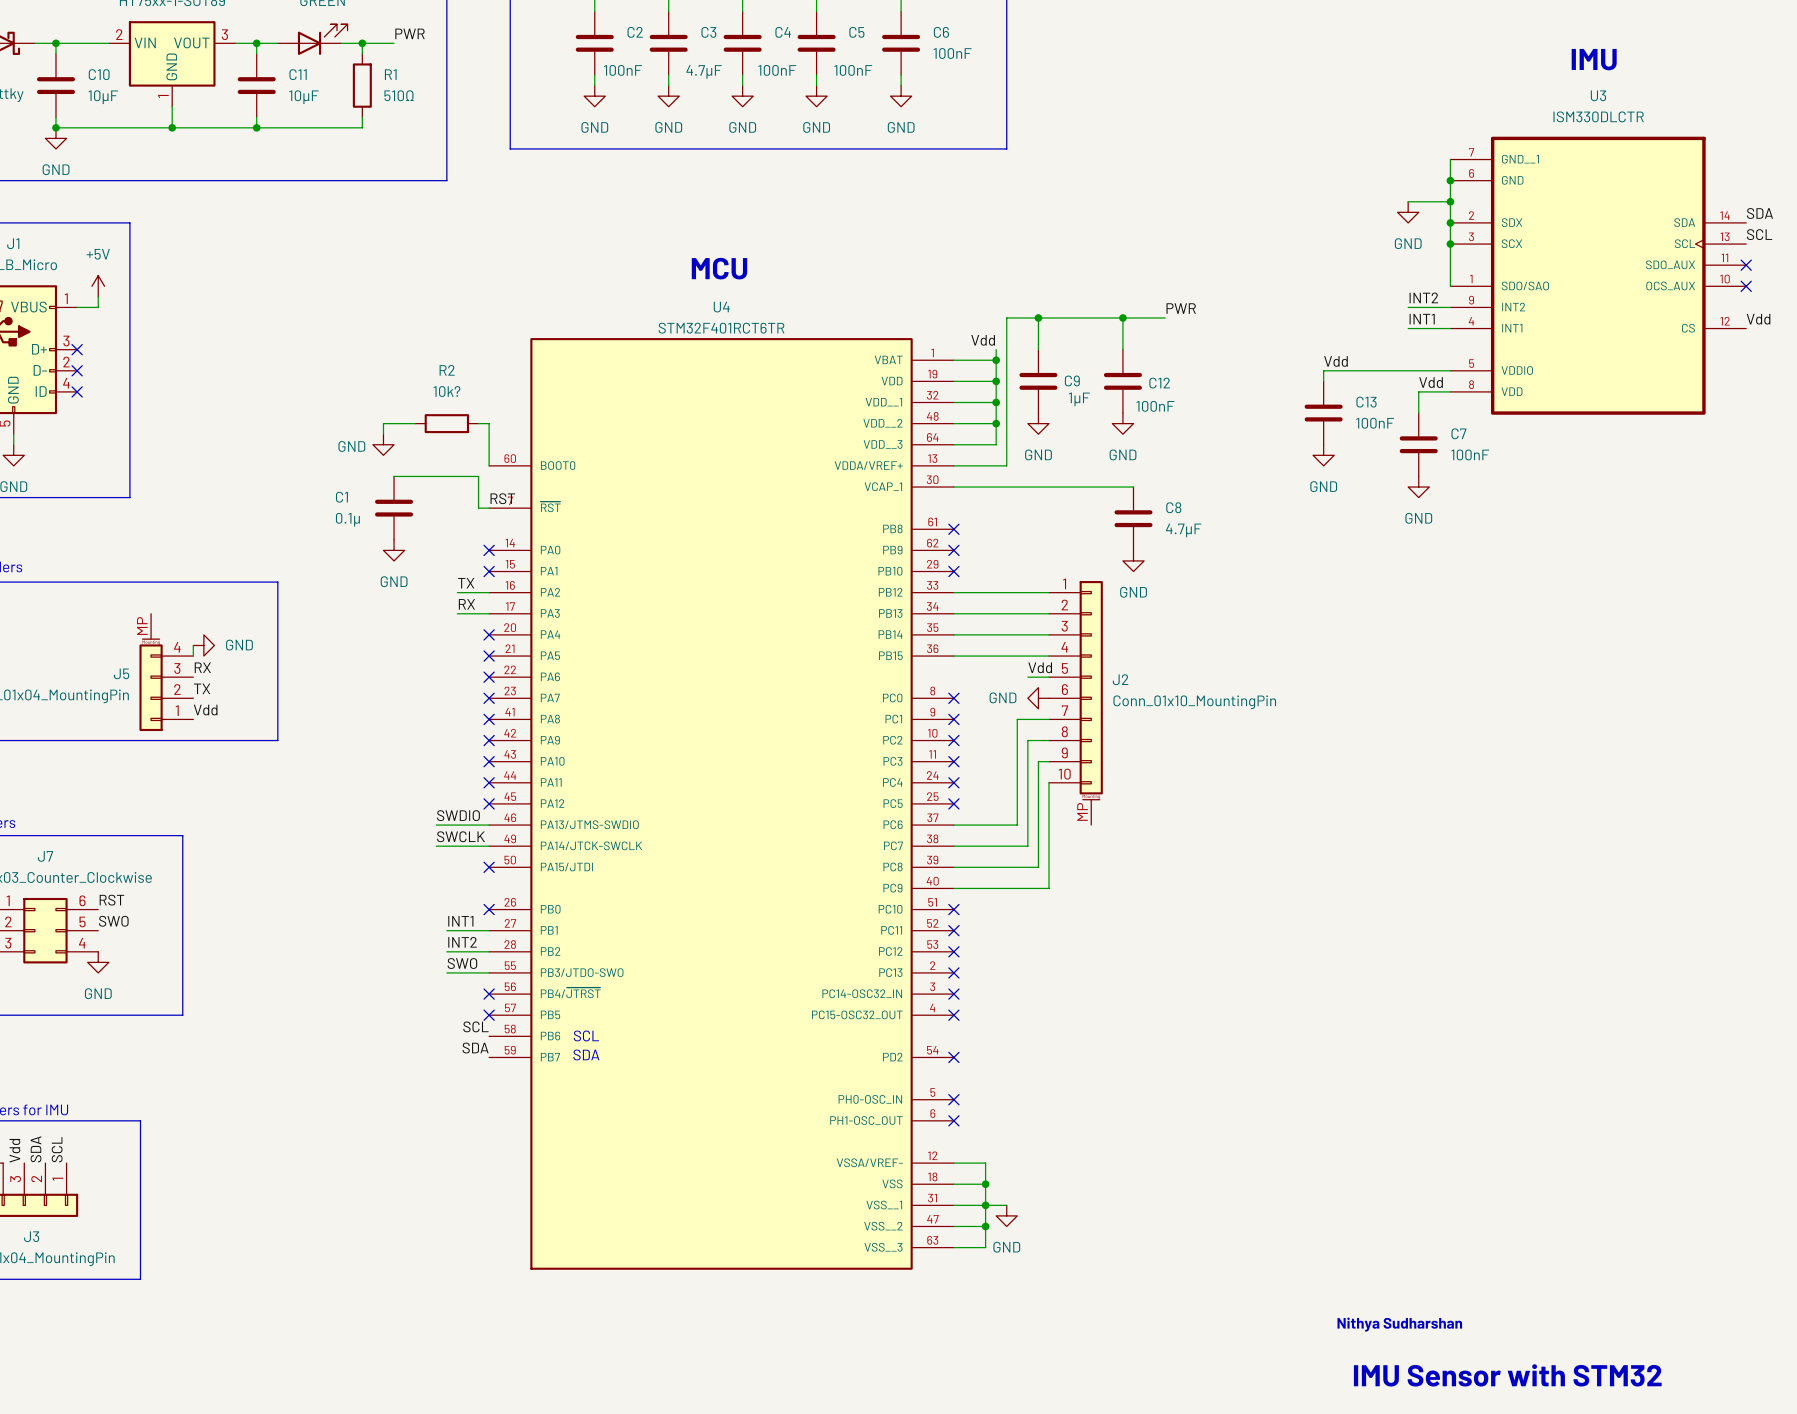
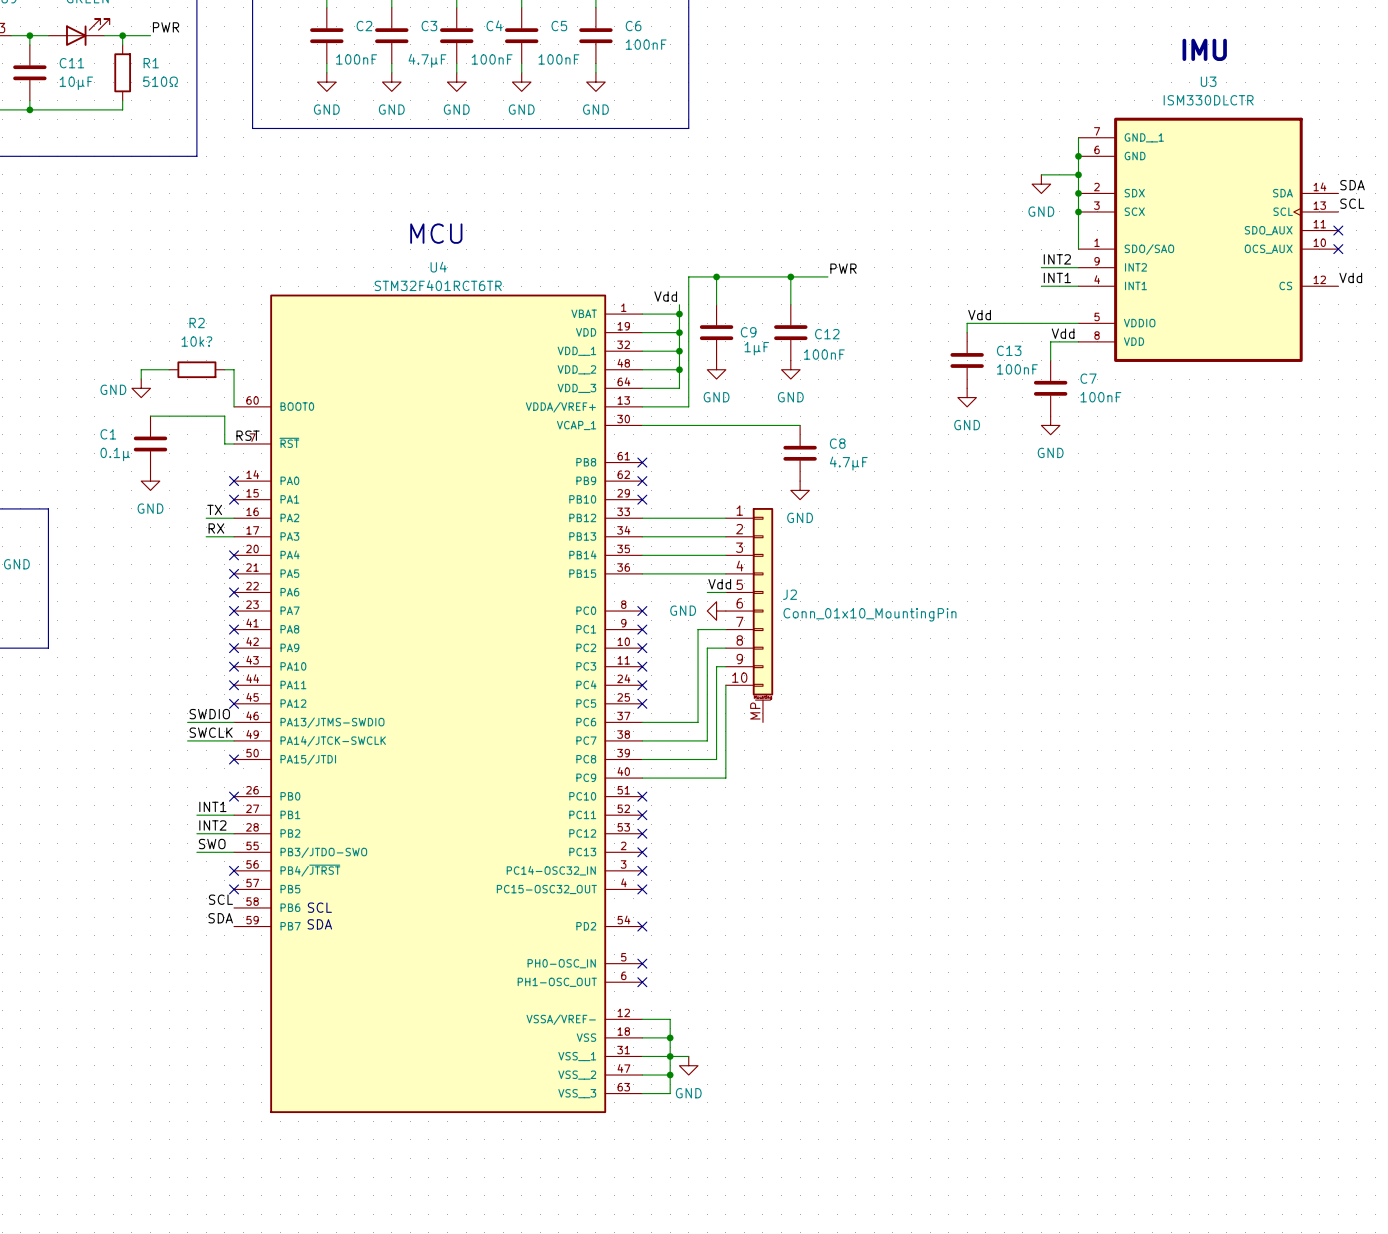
text: Nithya Sudharshan (1399, 1324) -> none
text: IMU Sensor with STM32 (1507, 1375) -> none

